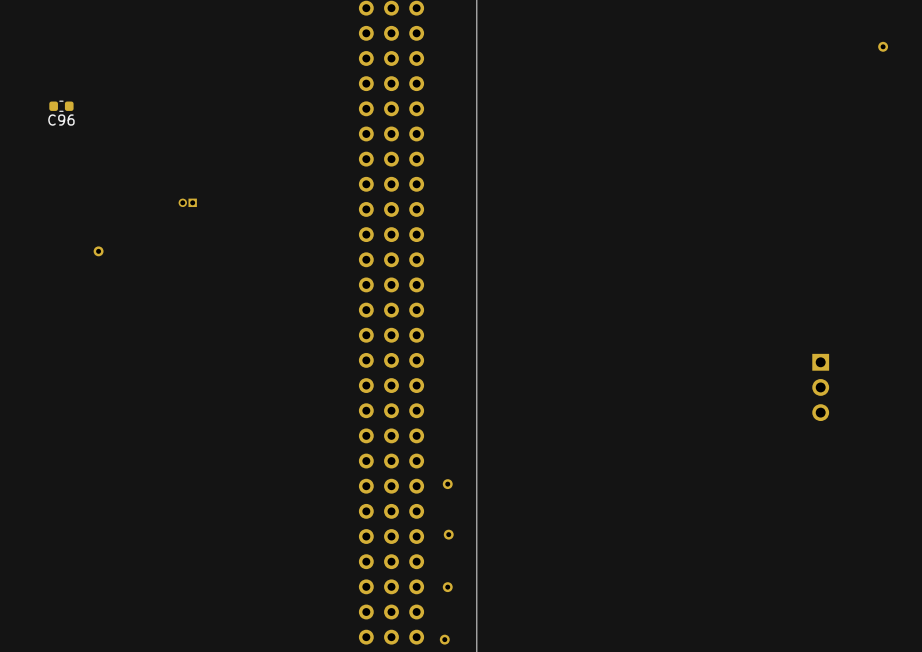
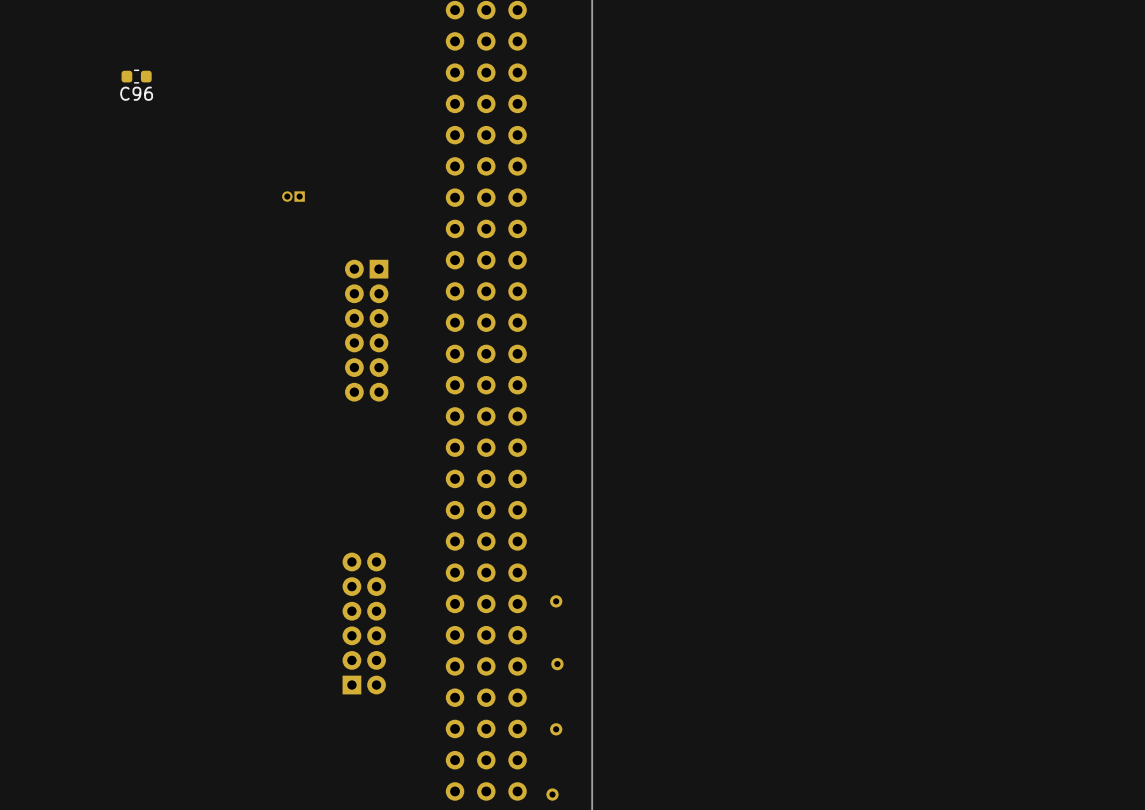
part: (883, 46) -> none
C96 position: (61, 106) -> (136, 76)
part position: (187, 202) -> (293, 196)
part: (98, 251) -> none
part: none -> (366, 330)
part: (820, 387) -> none
part: none -> (364, 623)

